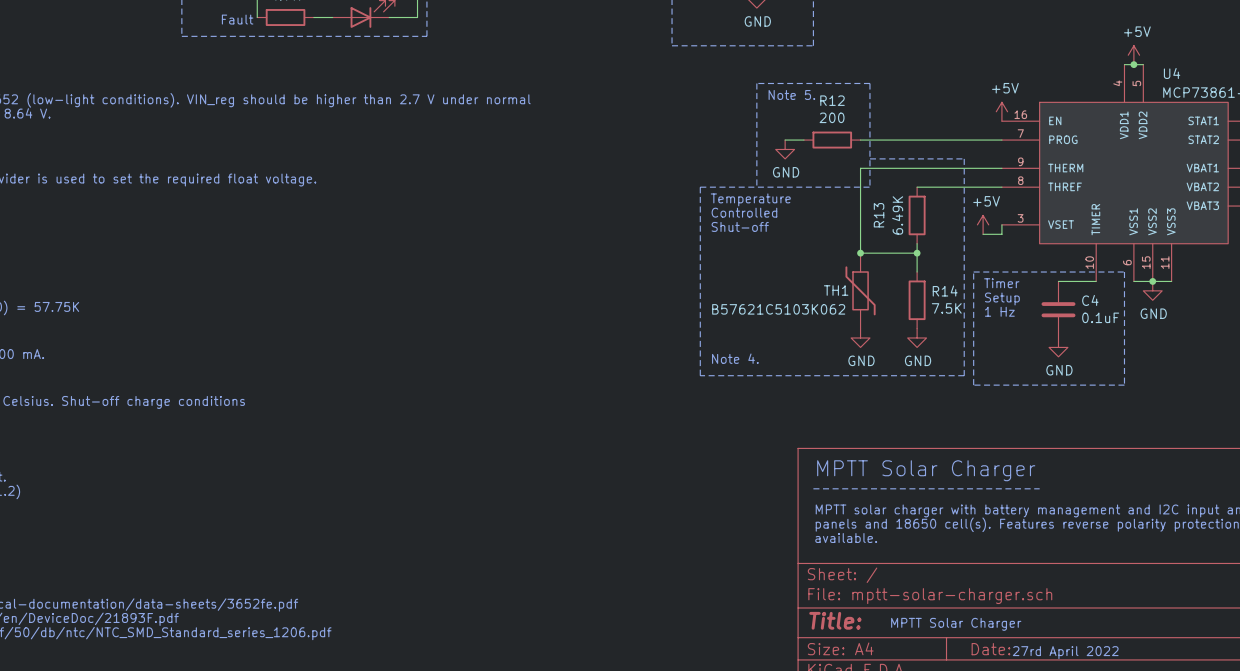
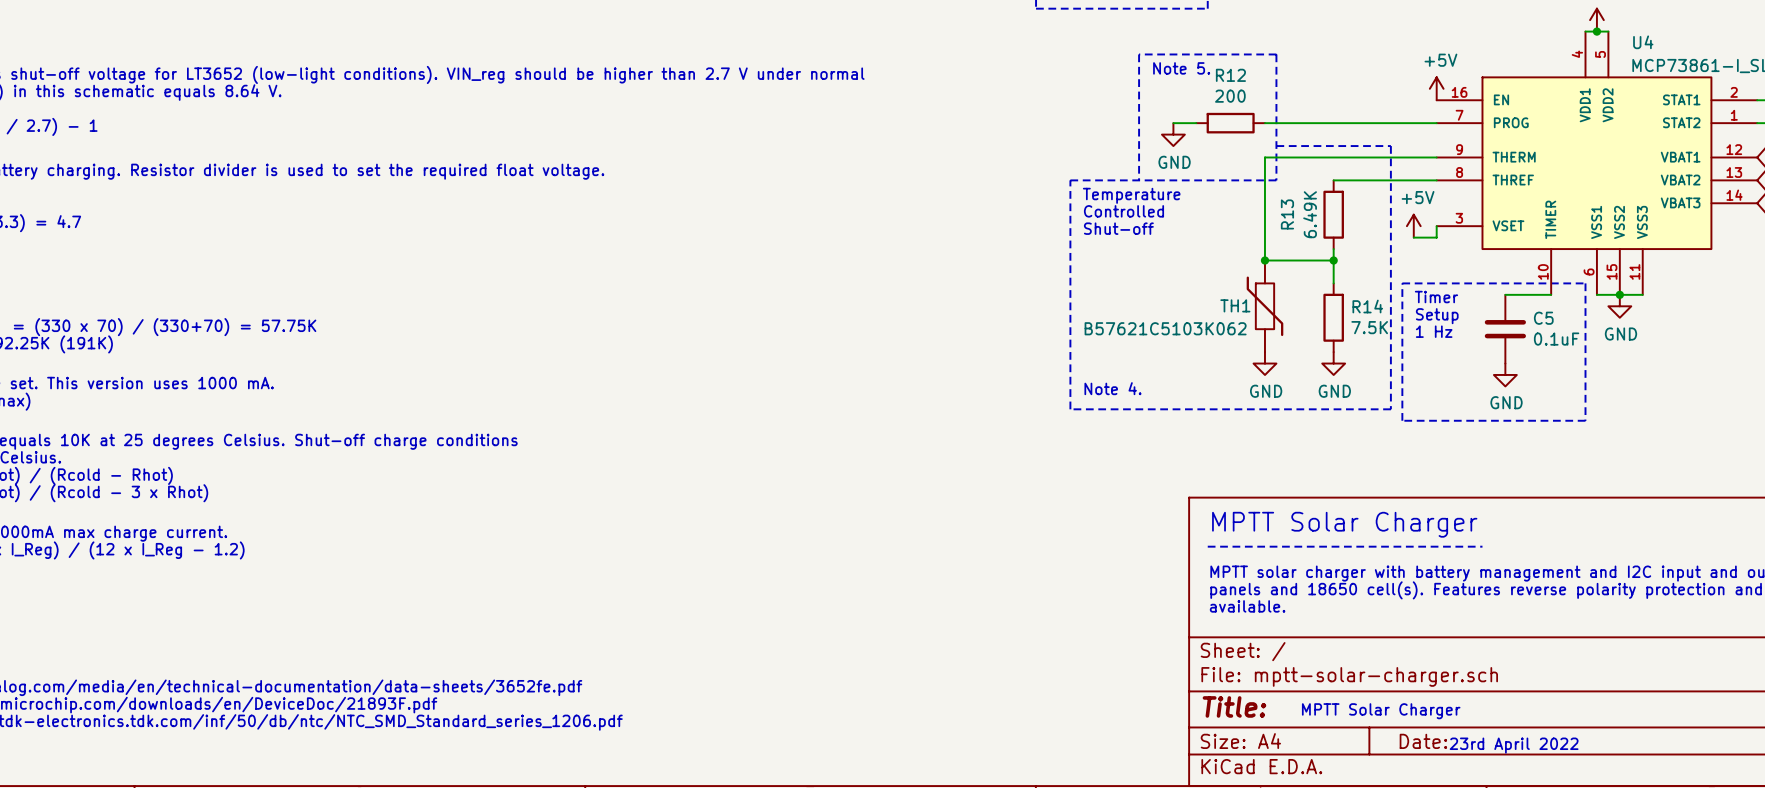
C4 name: C4 (1090, 300) -> C5 (1543, 318)
text: 27rd April 2022 (1065, 652) -> 23rd April 2022 (1514, 745)

